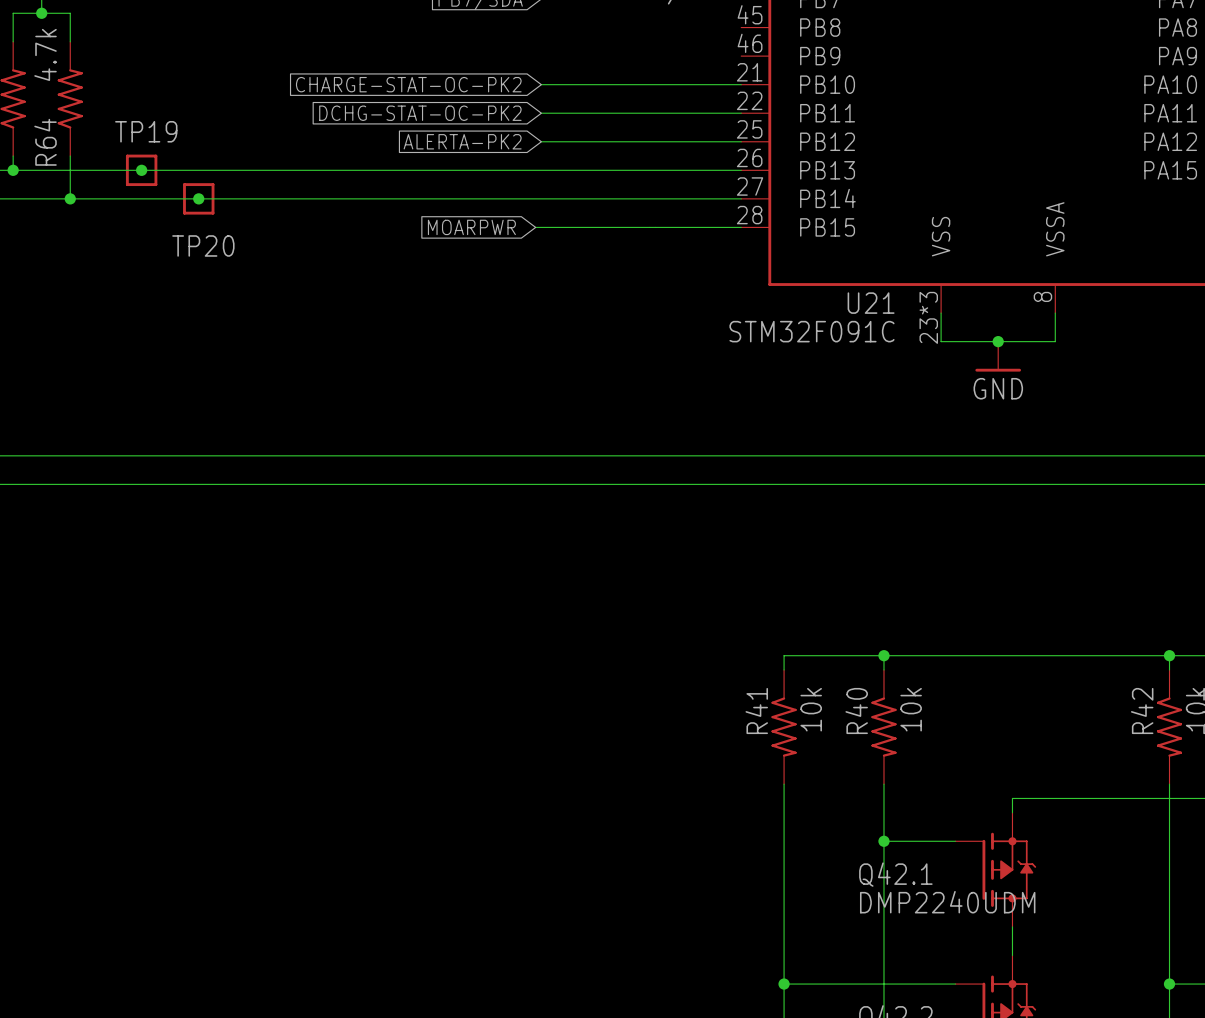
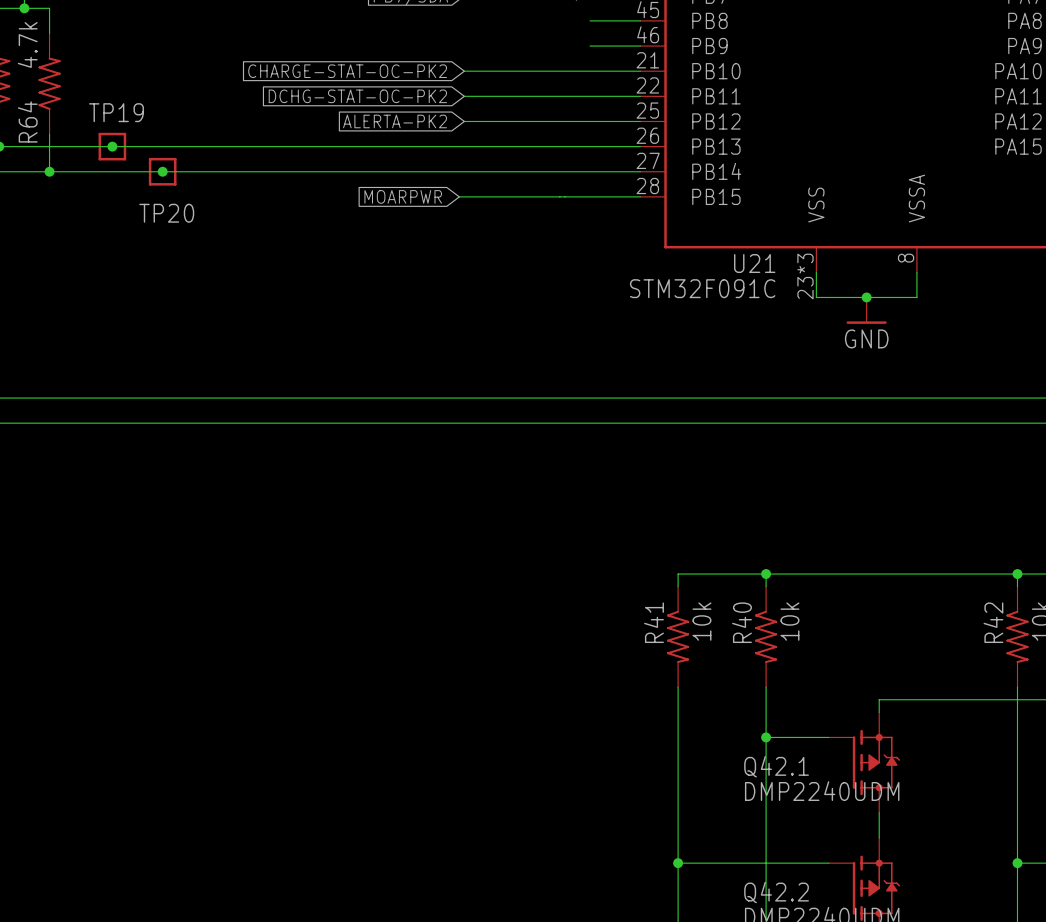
wire: none -> (590, 20) (640, 20)
wire: none -> (590, 46) (640, 46)

